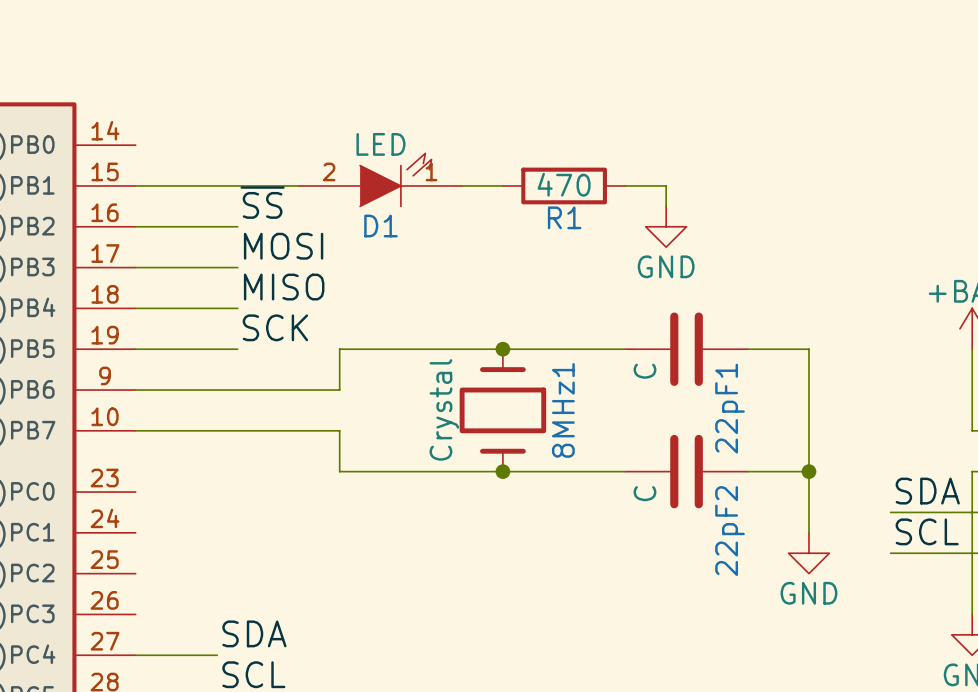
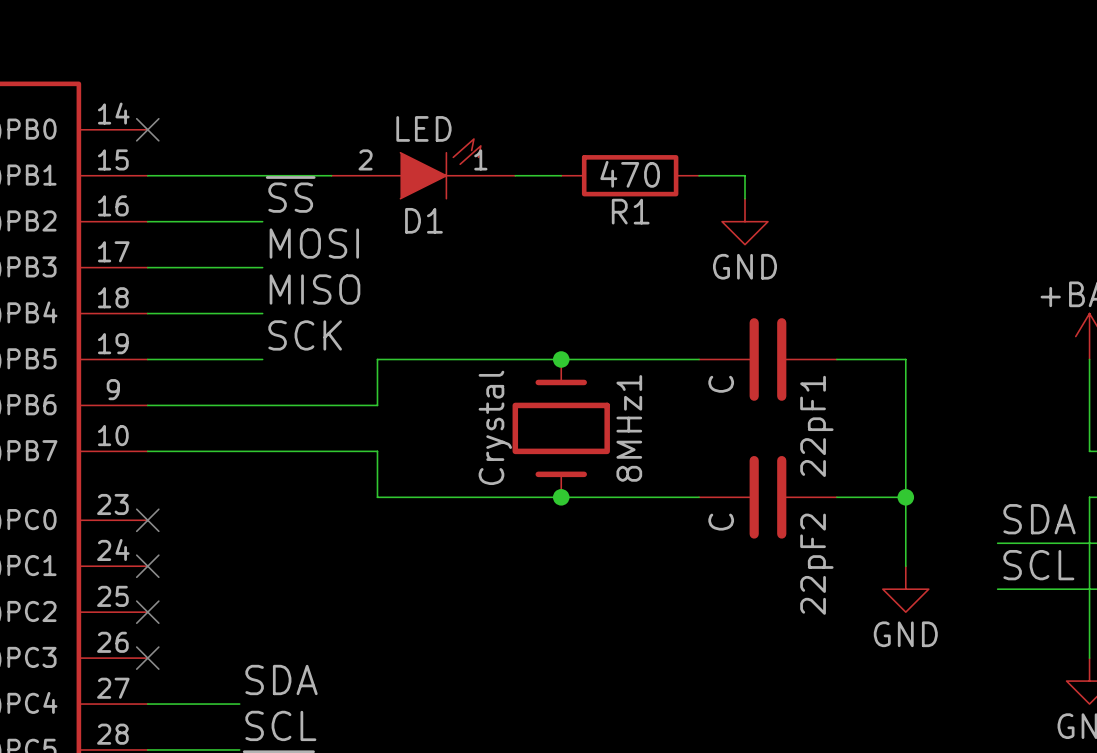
no-connect mark: none -> (147, 129)
no-connect mark: none -> (147, 520)
no-connect mark: none -> (147, 566)
no-connect mark: none -> (147, 612)
no-connect mark: none -> (147, 658)

